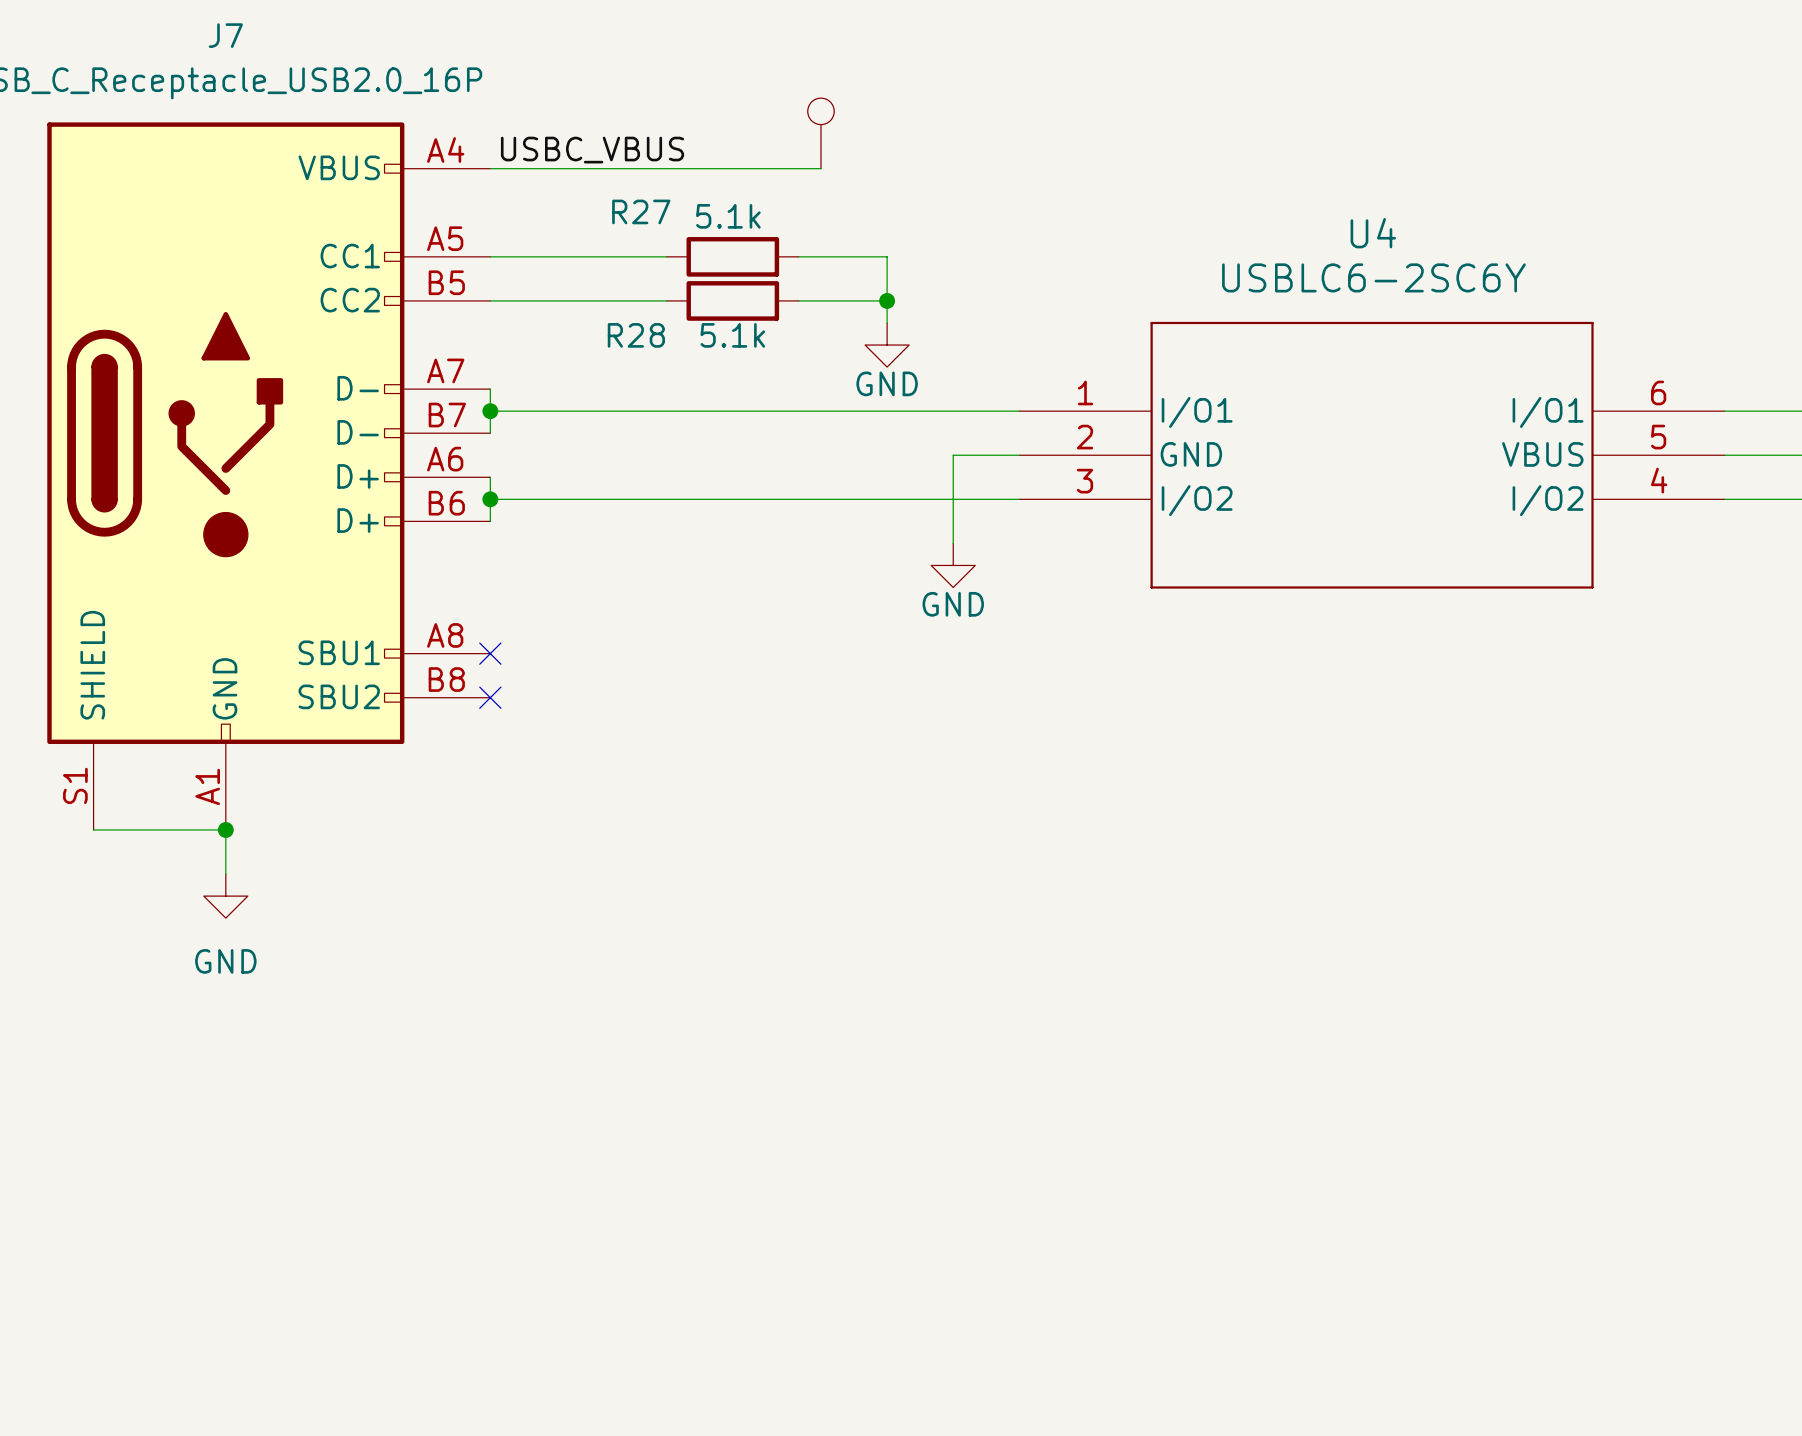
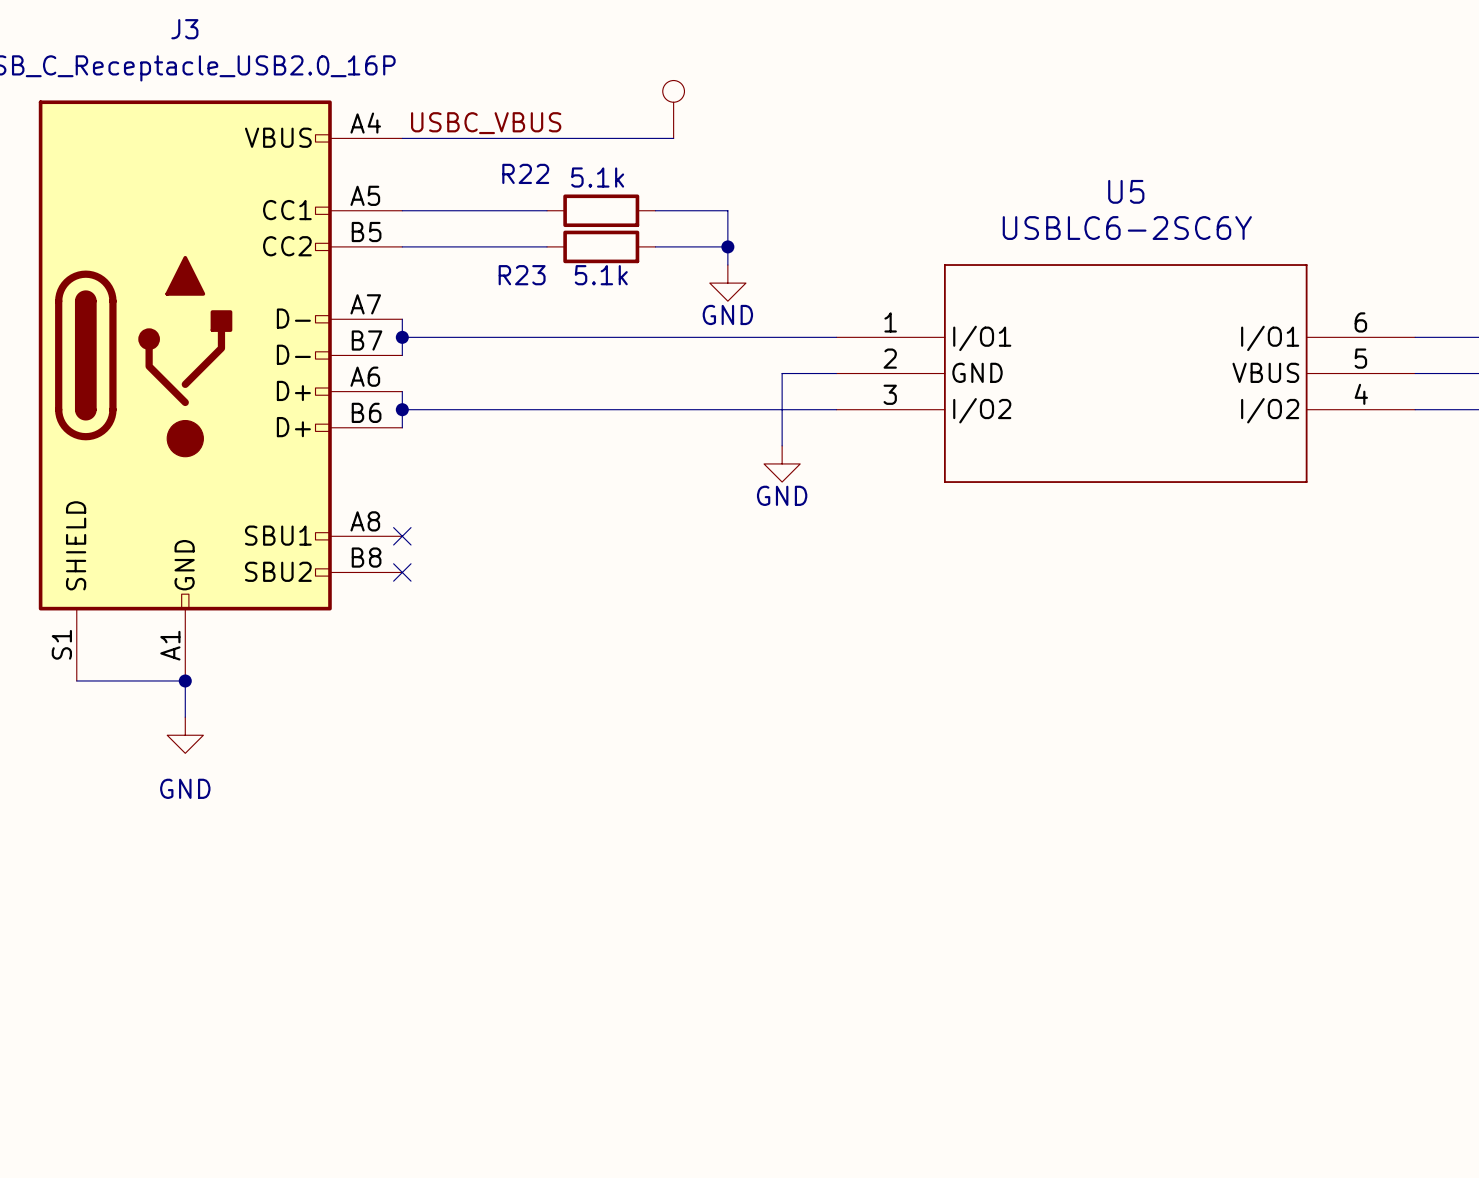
J7 name: J7 (225, 35) -> J3 (184, 29)
R27 name: R27 (641, 211) -> R22 (525, 173)
U4 name: U4 (1373, 233) -> U5 (1126, 191)
R28 name: R28 (636, 335) -> R23 (522, 275)

